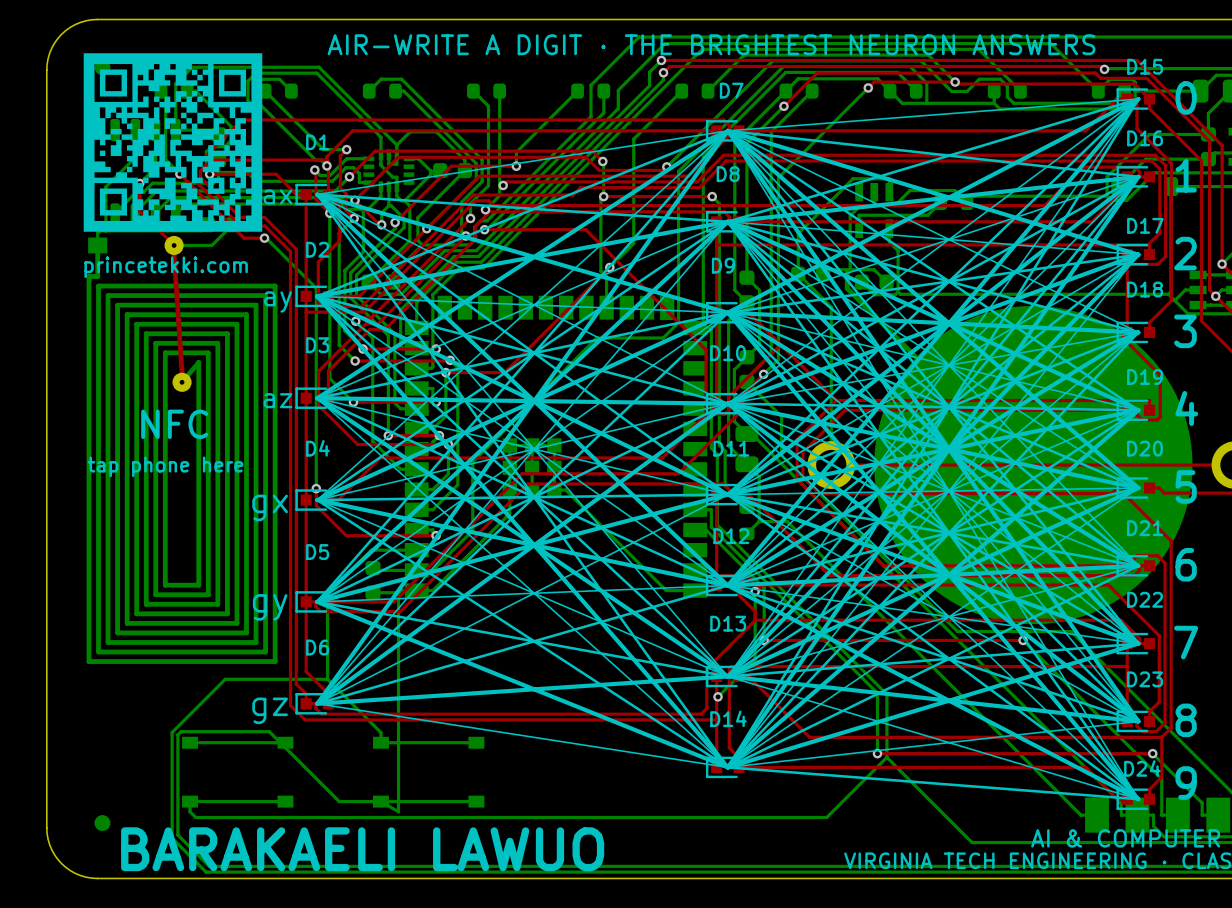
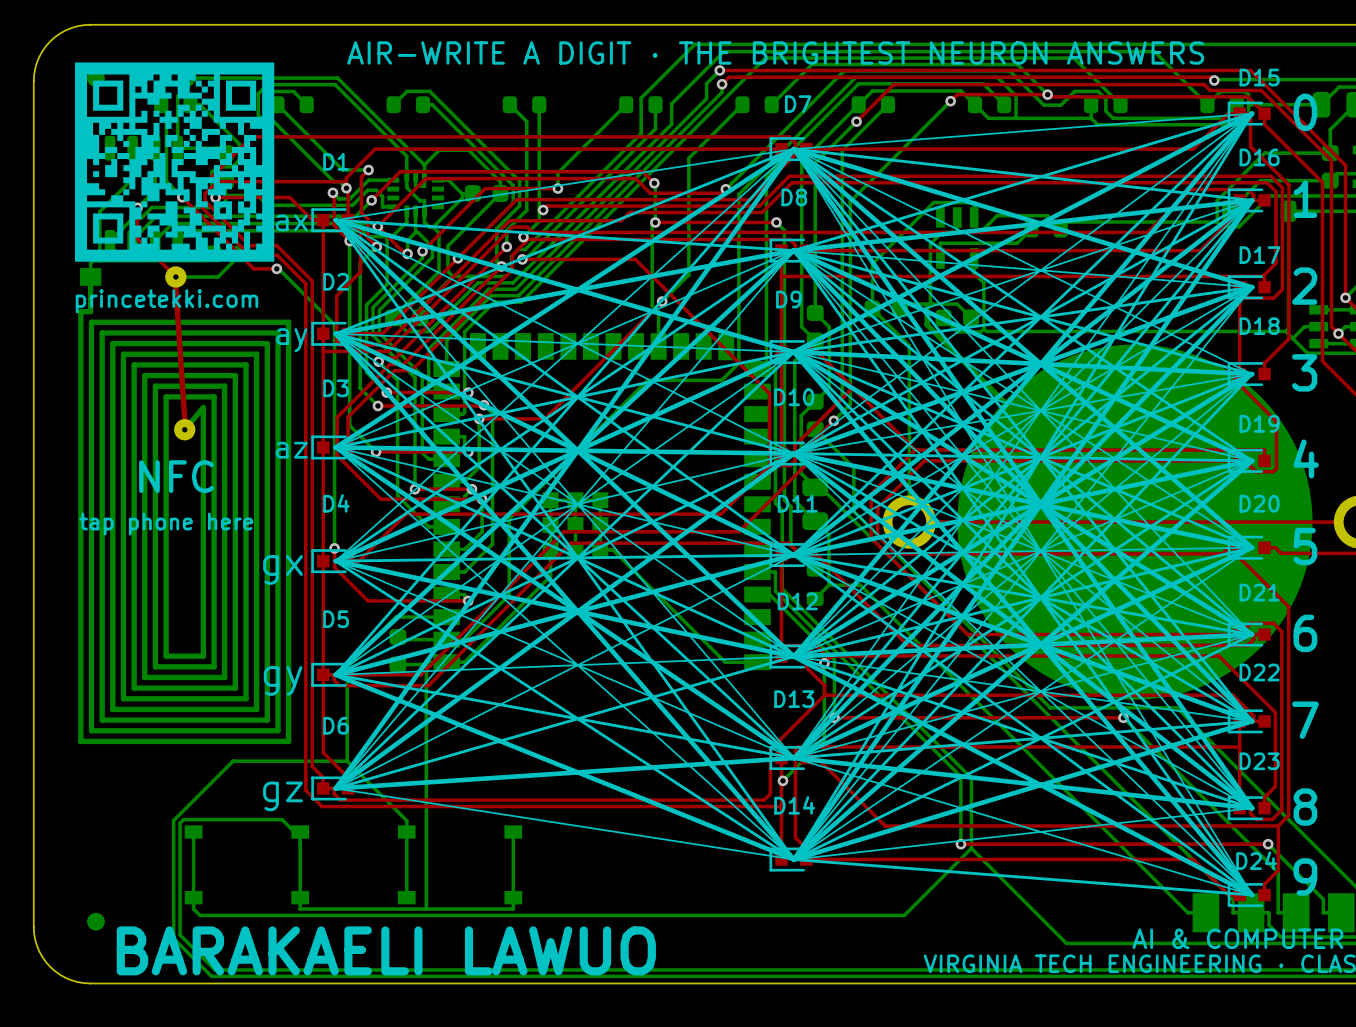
bottom track: (190, 742) (285, 742) -> (193, 831) (193, 897)
bottom track: (380, 742) (476, 742) -> none
bottom track: (285, 747) (339, 801) (476, 801) -> (300, 837) (300, 909) (513, 909) (513, 831)
bottom track: (190, 801) (285, 801) -> none
bottom track: (380, 801) (398, 811) -> (406, 897) (406, 831)

